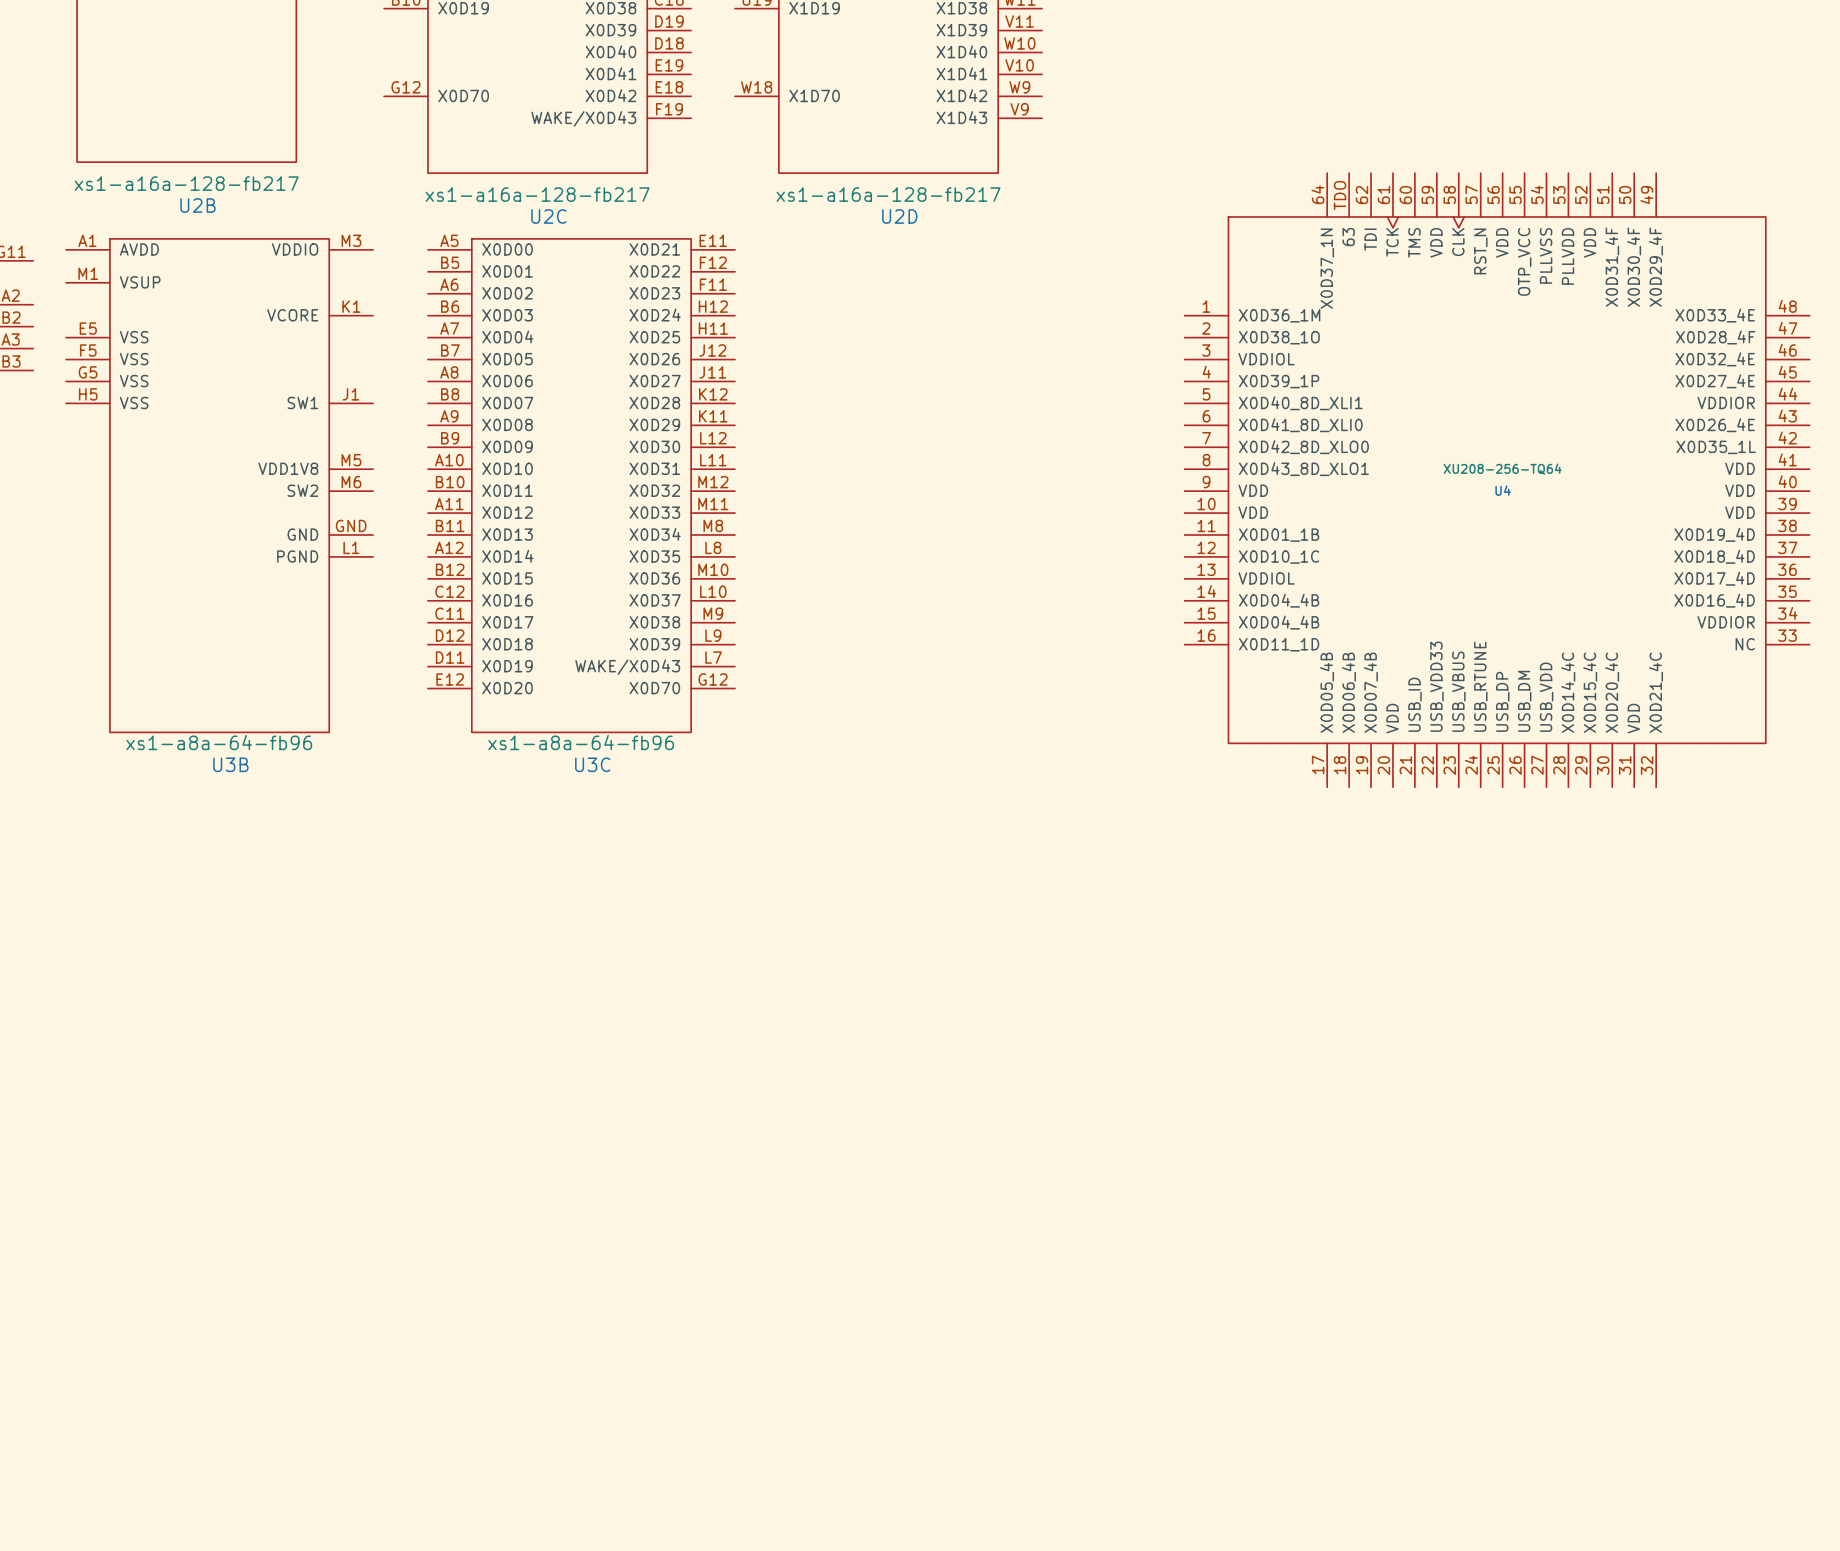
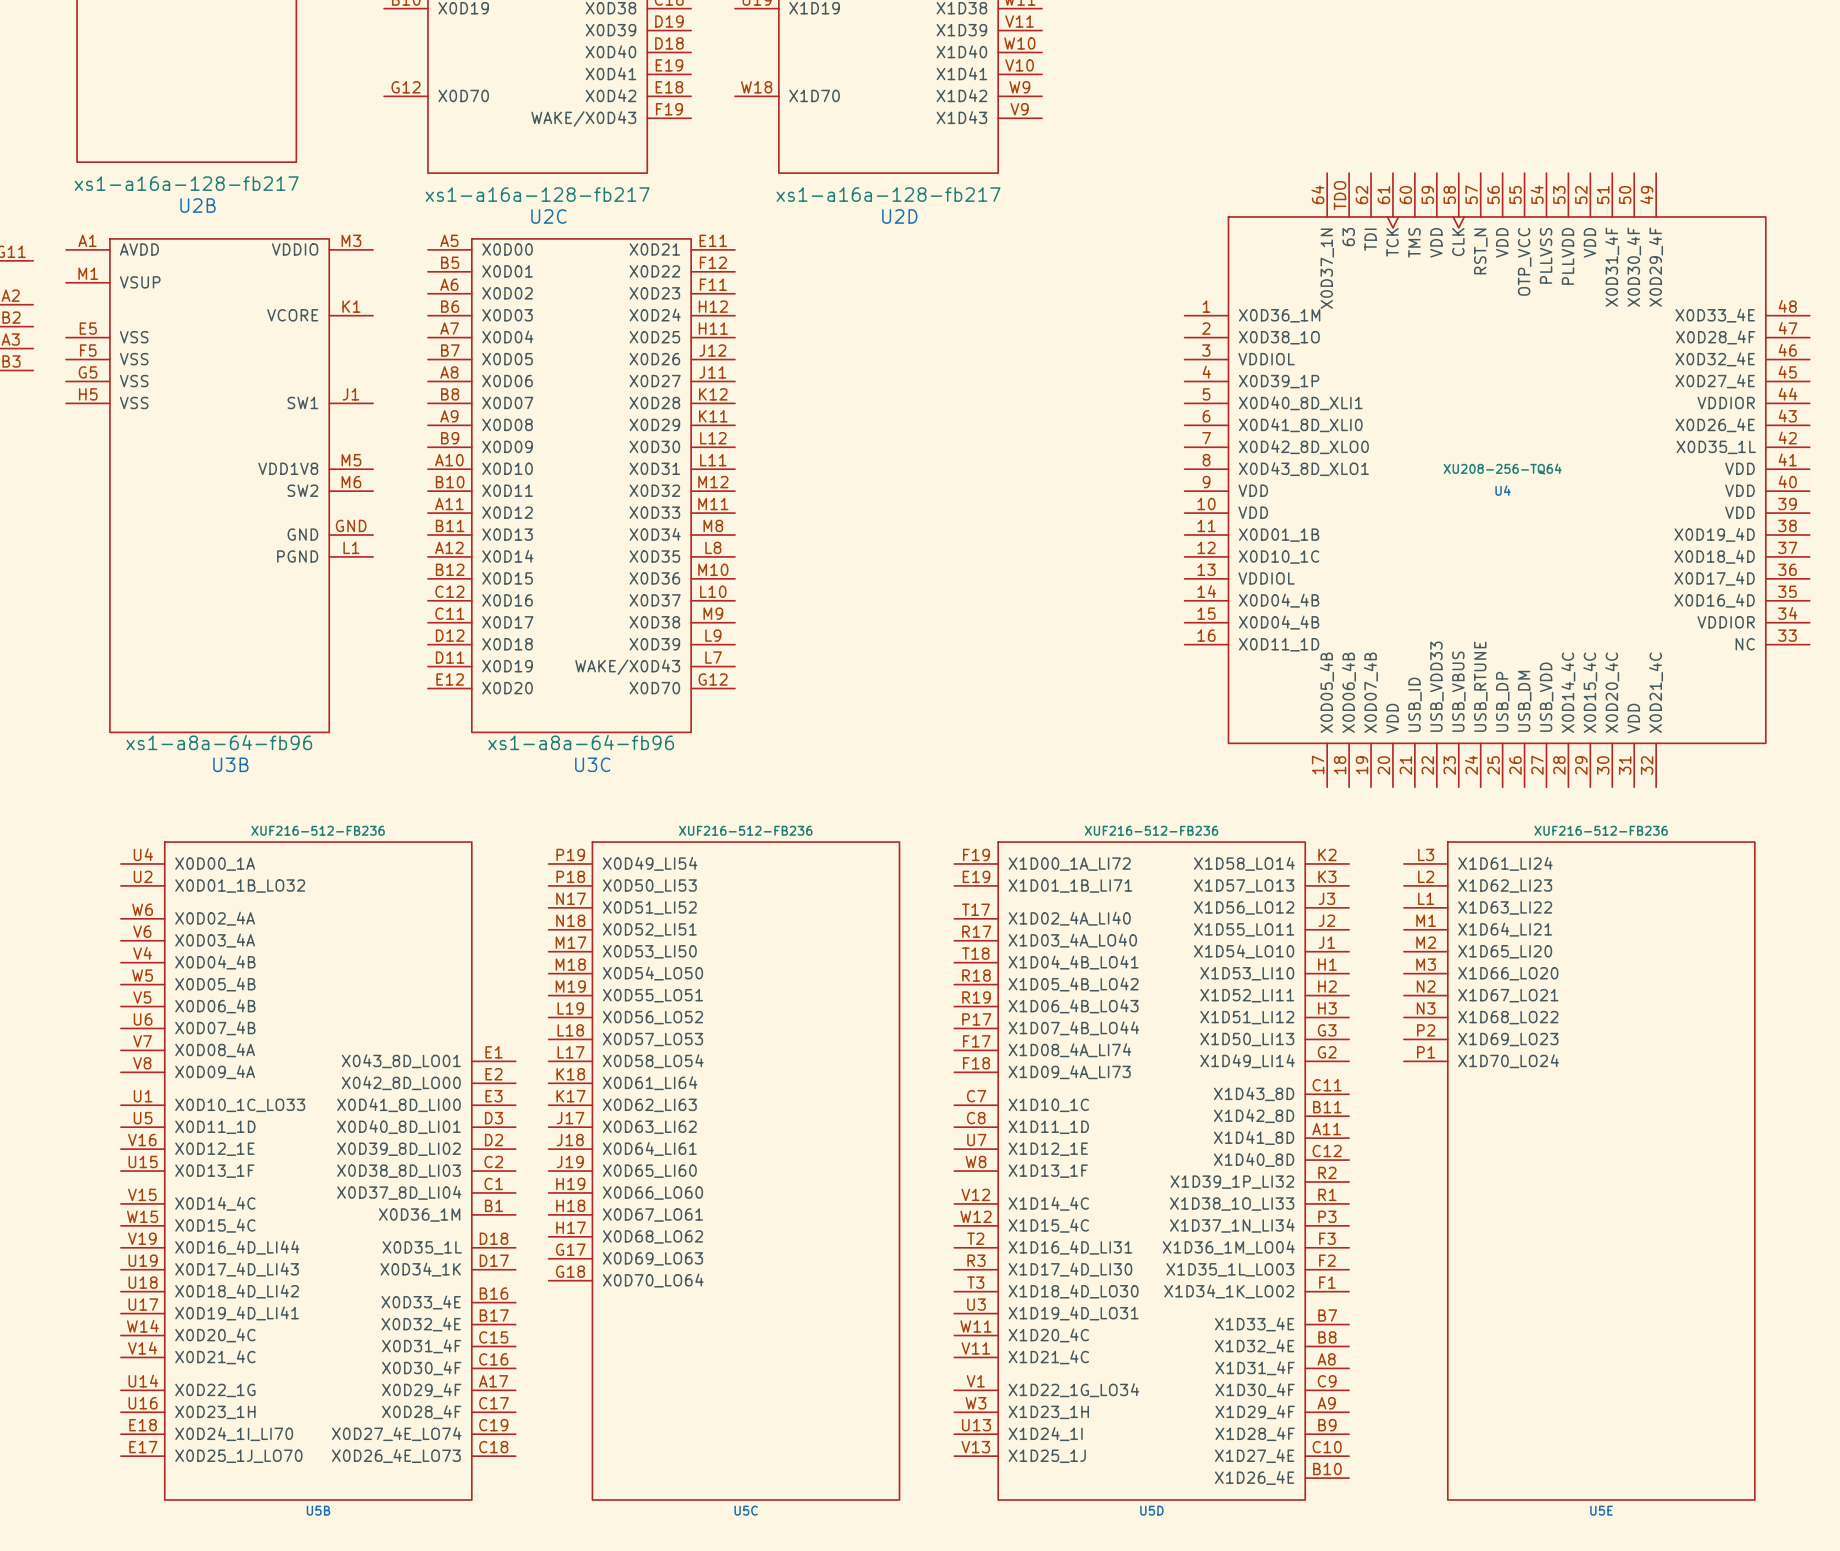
U5B: none -> XUF216-512-FB236 (318, 1171)
U5C: none -> XUF216-512-FB236 (724, 1171)
U5D: none -> XUF216-512-FB236 (1151, 1171)
U5E: none -> XUF216-512-FB236 (1579, 1171)

